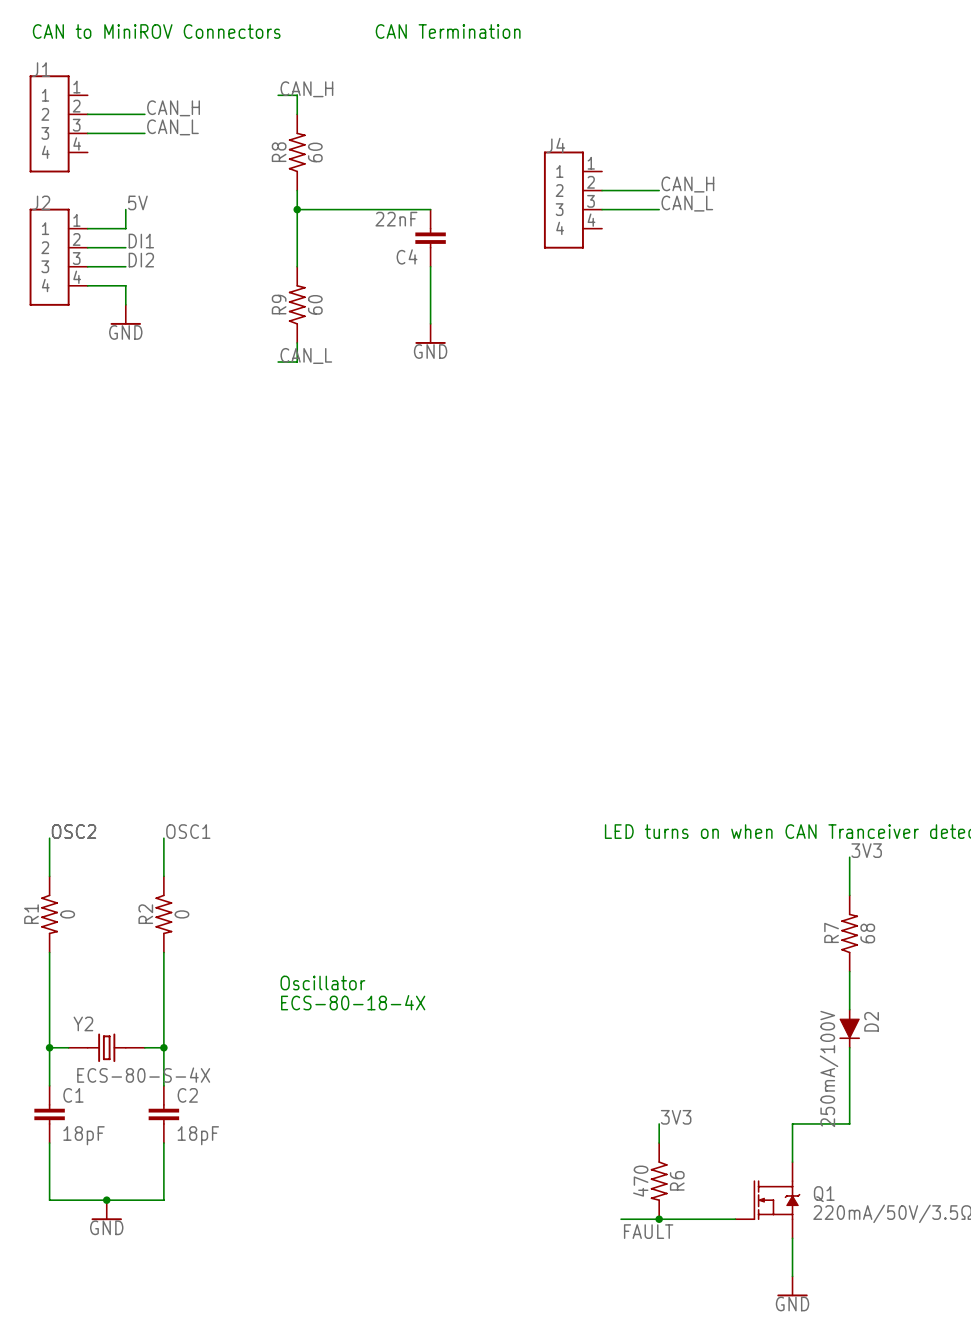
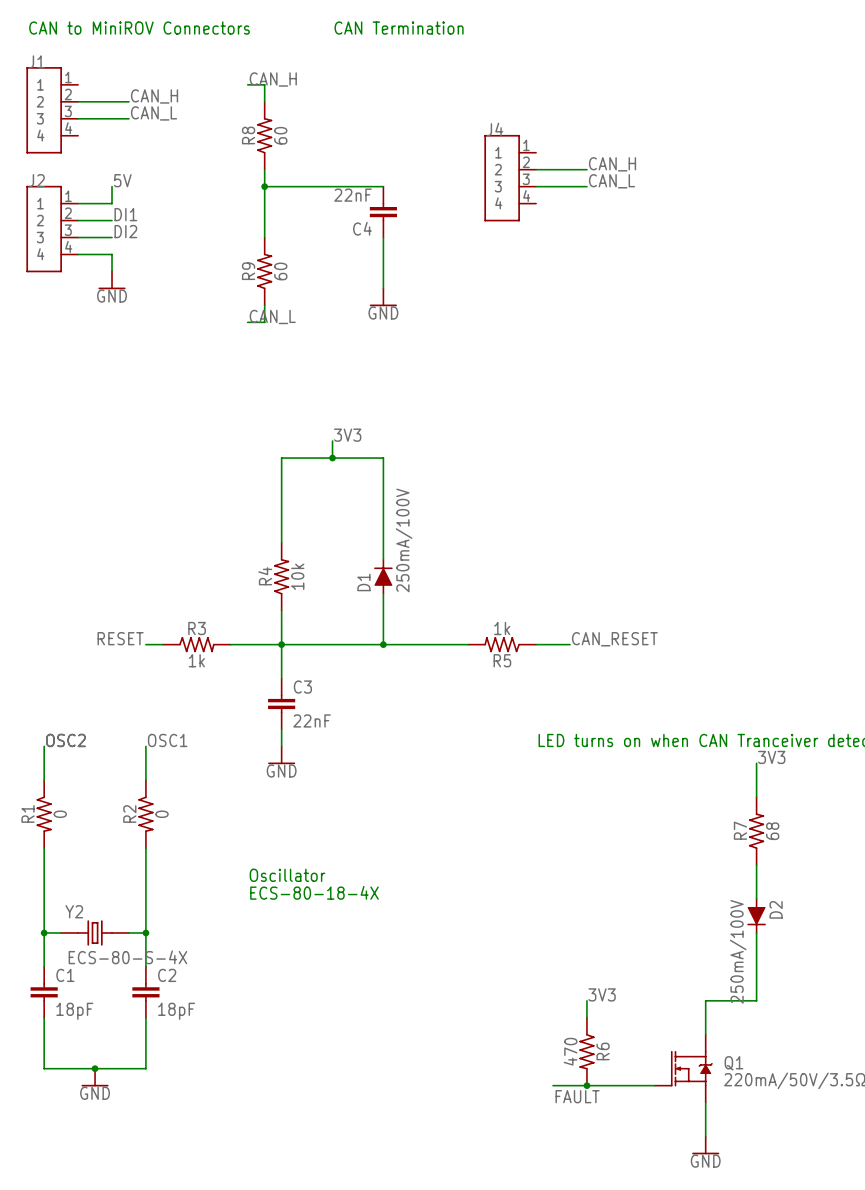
label: none -> 3V3 (347, 435)
wire: none -> (332, 441) (332, 458)
junction: none -> (332, 458)
wire: none -> (281, 542) (281, 458) (383, 458) (383, 559)
R4: none -> 10k (281, 576)
D1: none -> 250mA/100V (383, 576)
wire: none -> (383, 593) (383, 644)
wire: none -> (281, 610) (281, 678)
label: none -> RESET (120, 638)
label: none -> CAN_RESET (614, 639)
wire: none -> (145, 644) (162, 644)
R3: none -> 1k (196, 644)
wire: none -> (230, 644) (468, 644)
junction: none -> (281, 644)
junction: none -> (383, 644)
R5: none -> 1k (502, 644)
wire: none -> (536, 644) (569, 644)
C3: none -> 22nF (281, 703)
wire: none -> (281, 729) (281, 746)
power symbol: none -> GND (281, 755)

